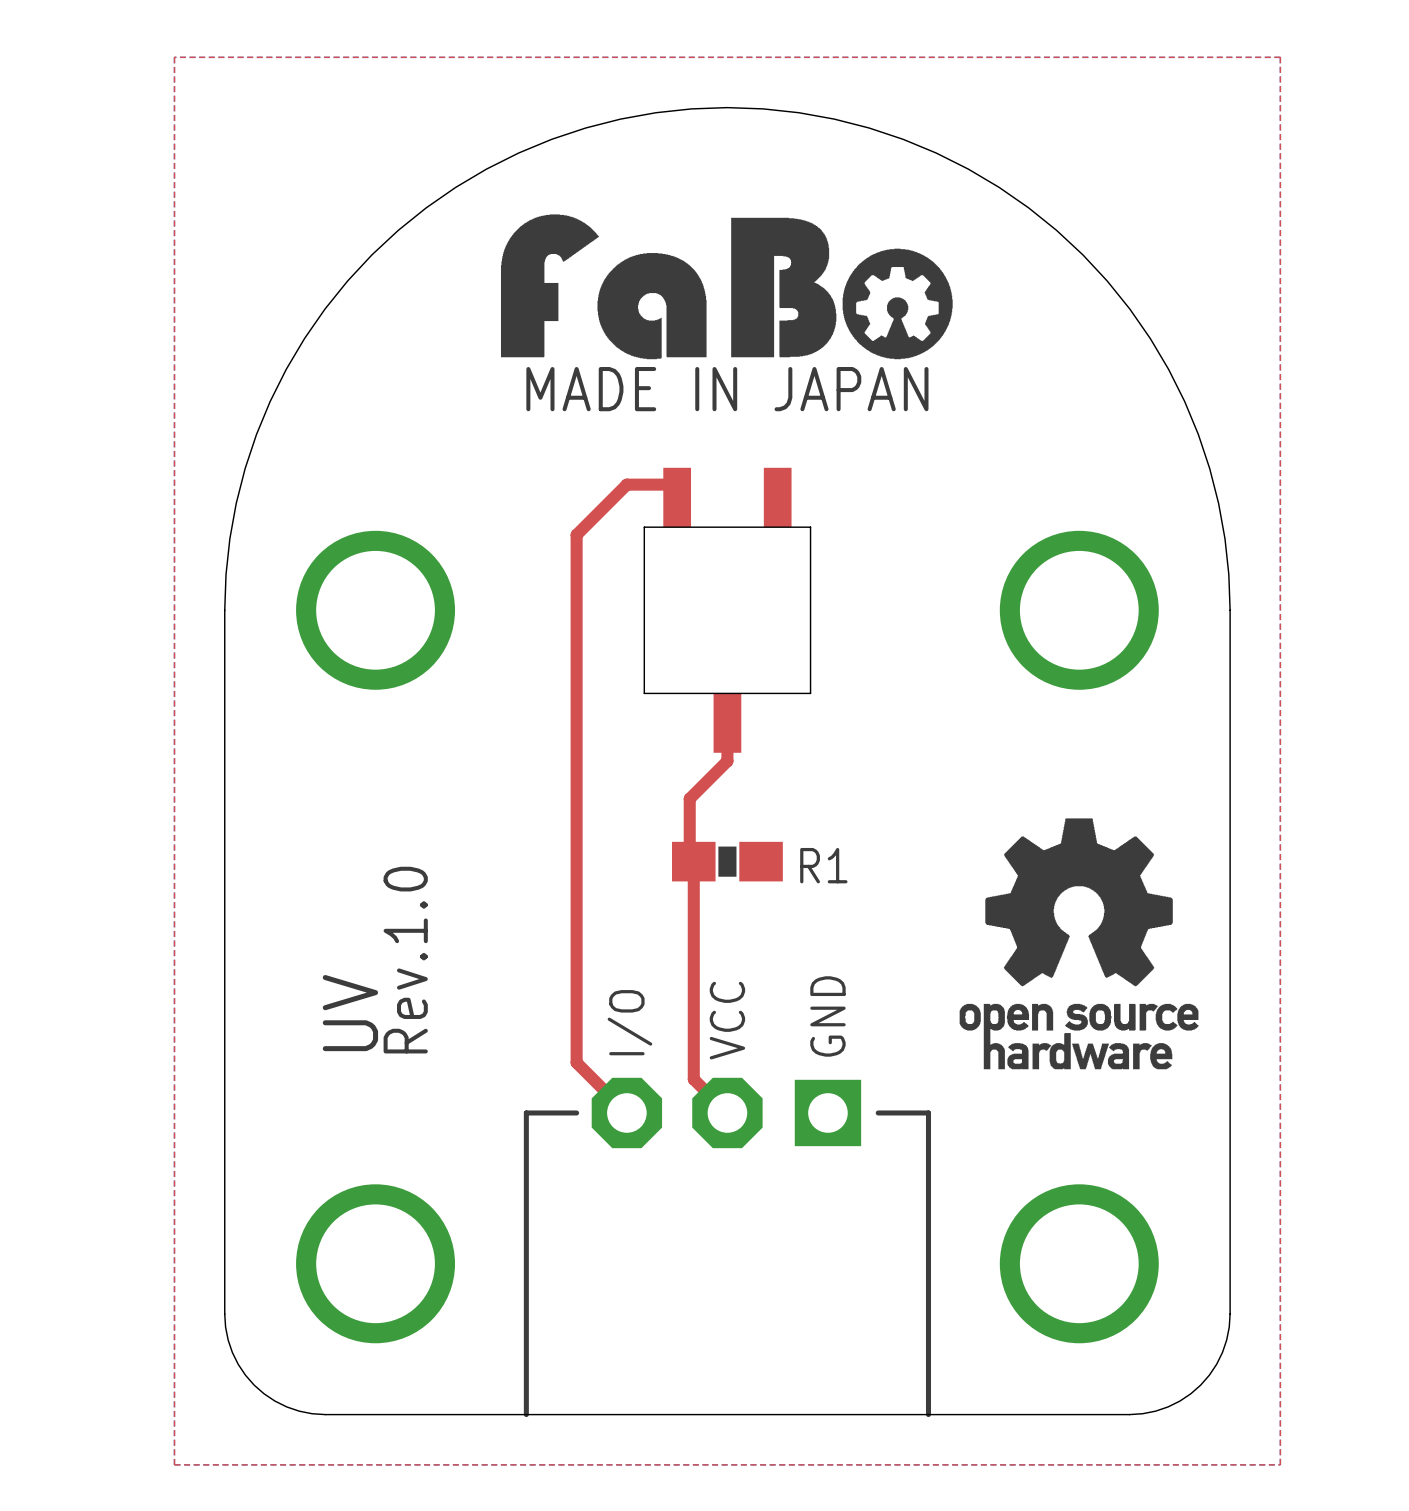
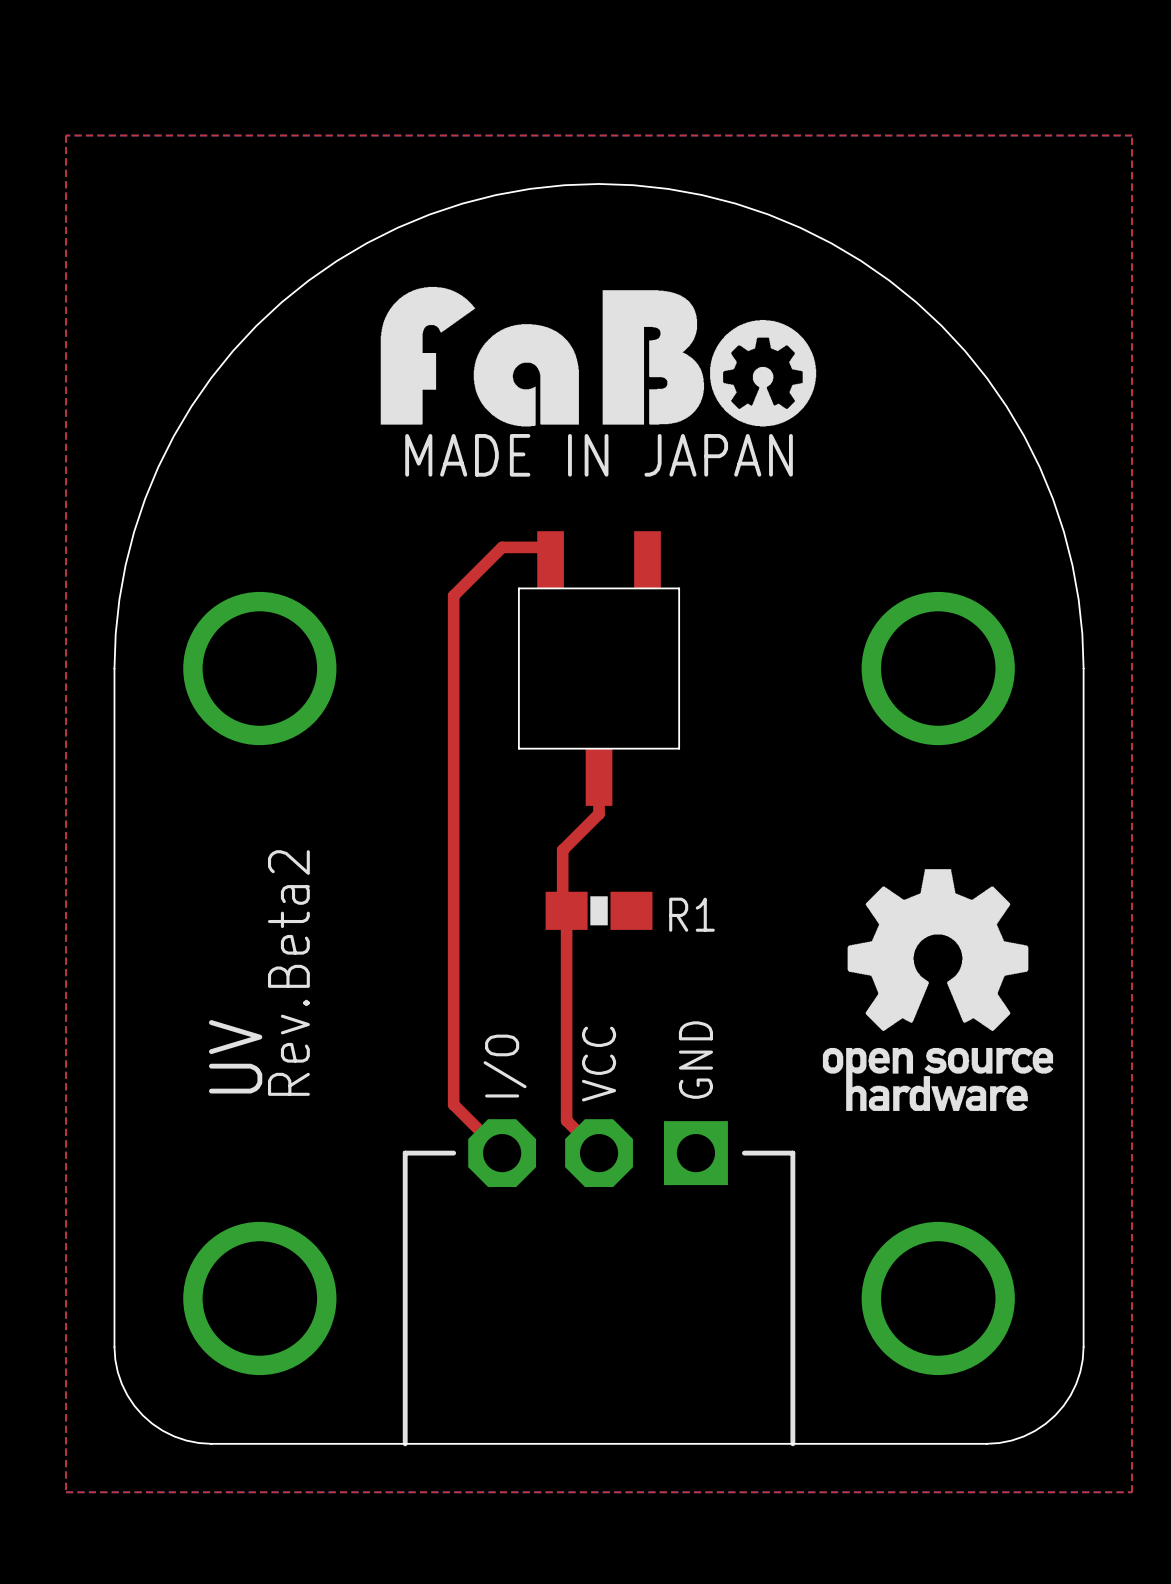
text: Rev.1.0 (405, 960) -> Rev.Beta2 (288, 973)

